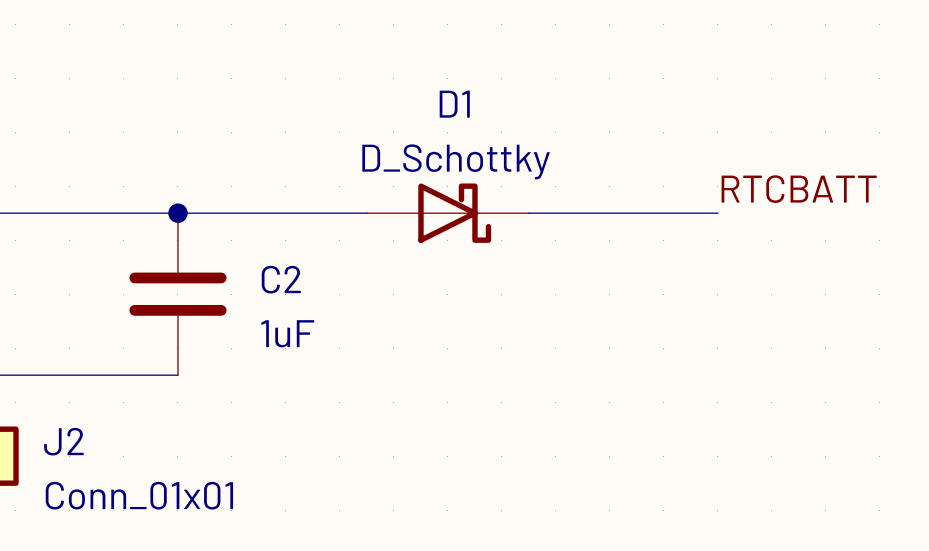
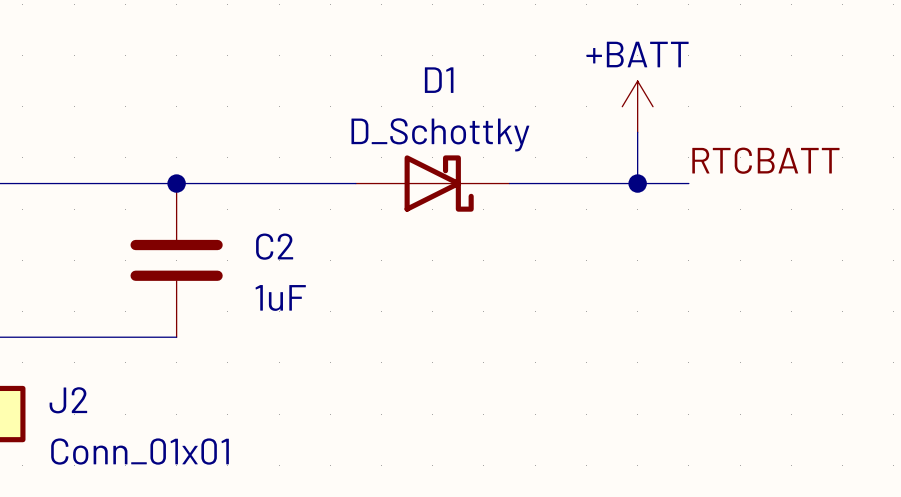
power symbol: none -> +BATT (637, 106)
wire: none -> (637, 132) (637, 183)
junction: none -> (637, 183)

